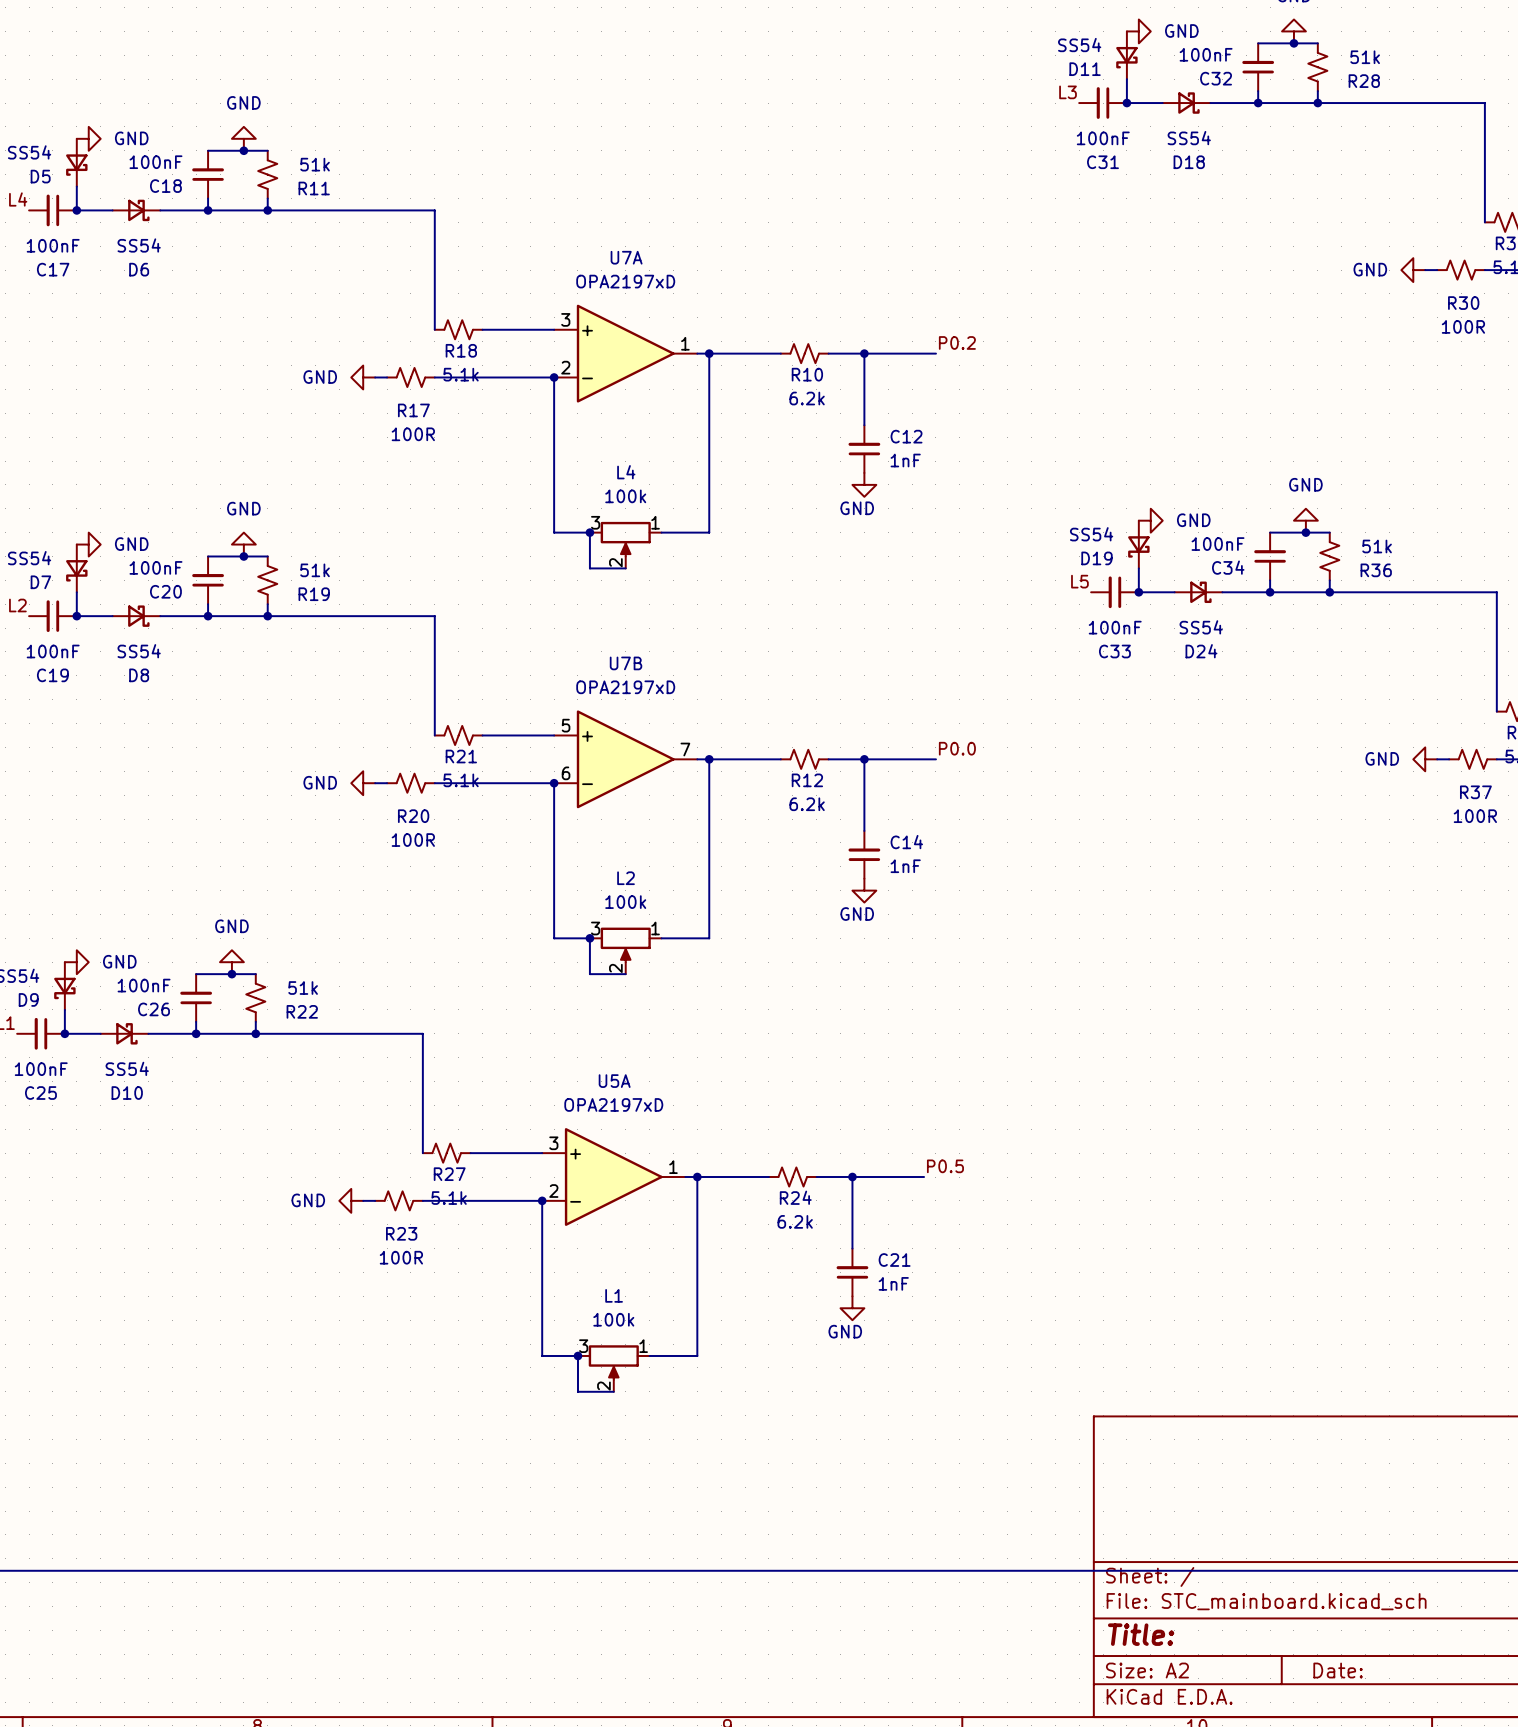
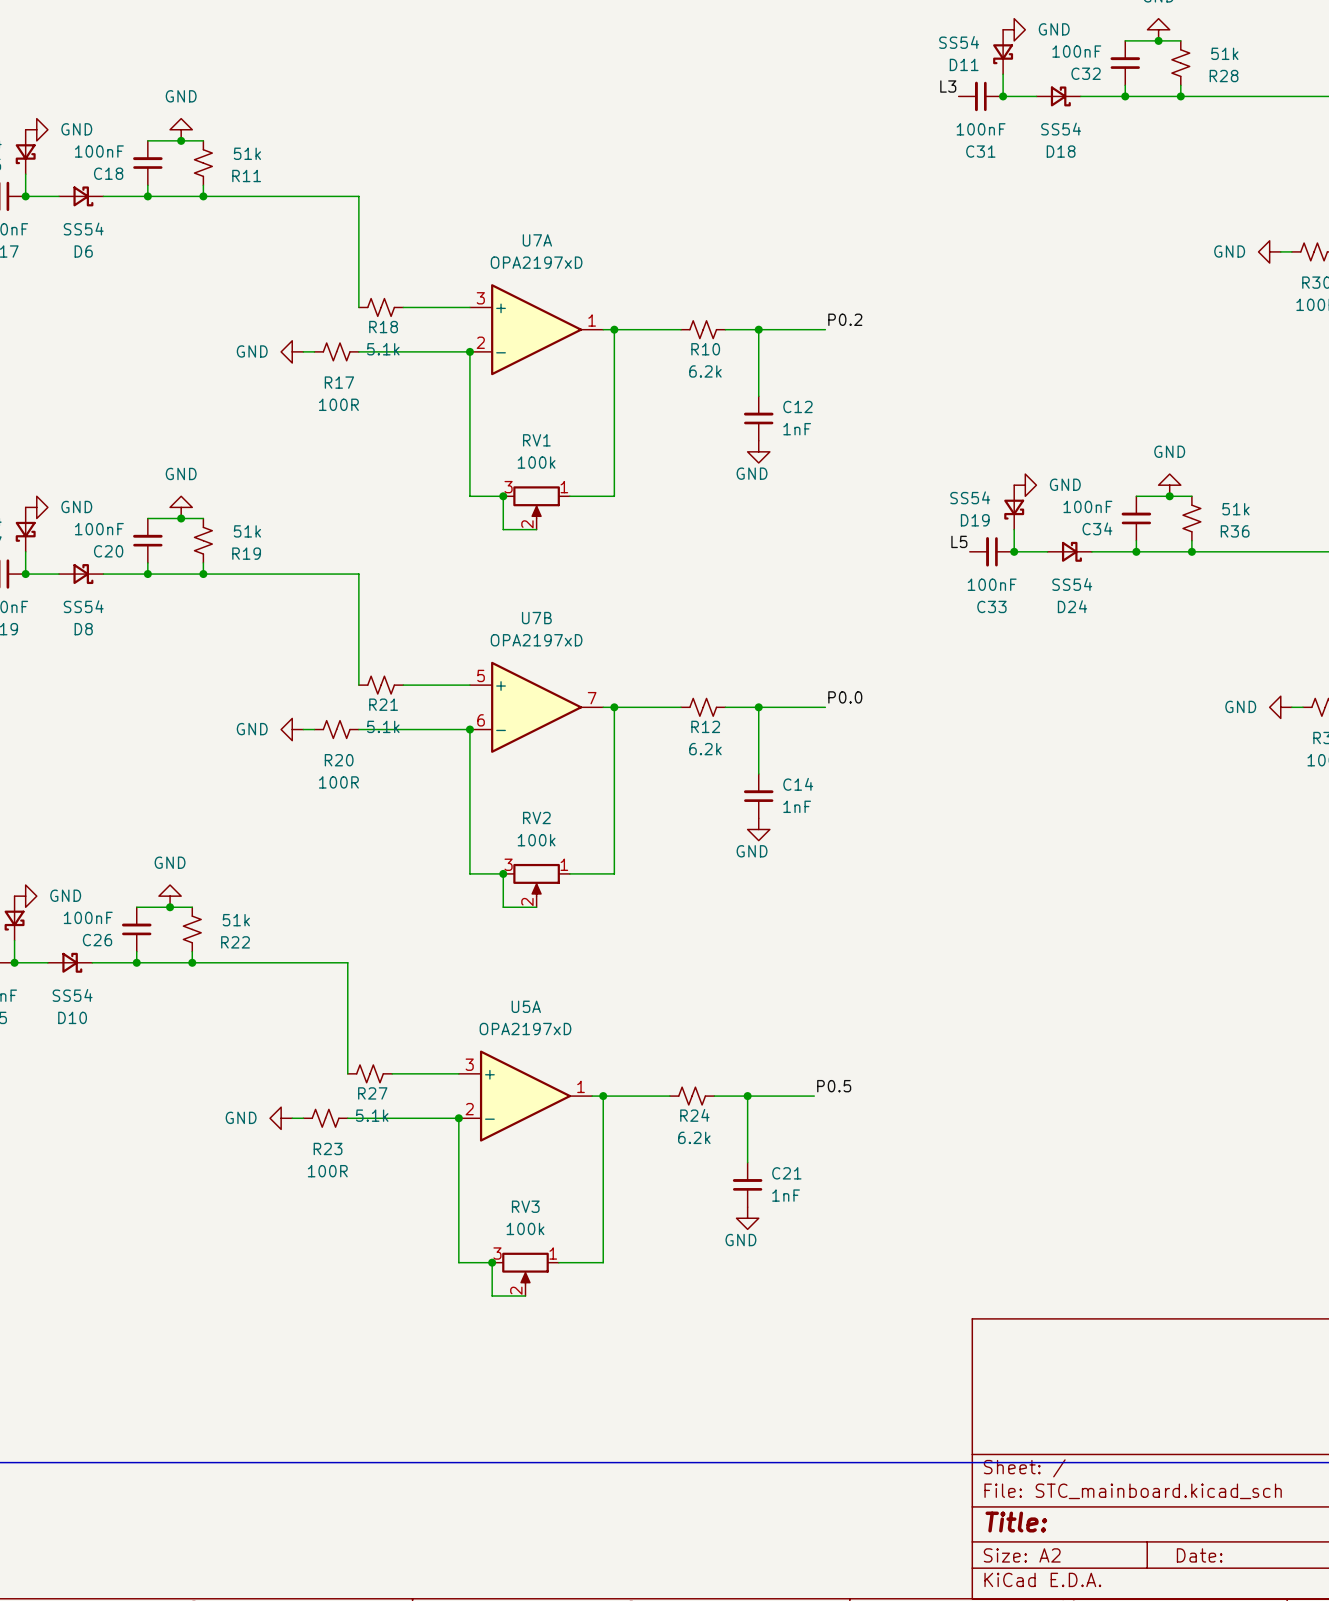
L4 name: L4 (626, 472) -> RV1 (536, 440)
L2 name: L2 (626, 878) -> RV2 (536, 817)
L1 name: L1 (614, 1295) -> RV3 (525, 1206)

